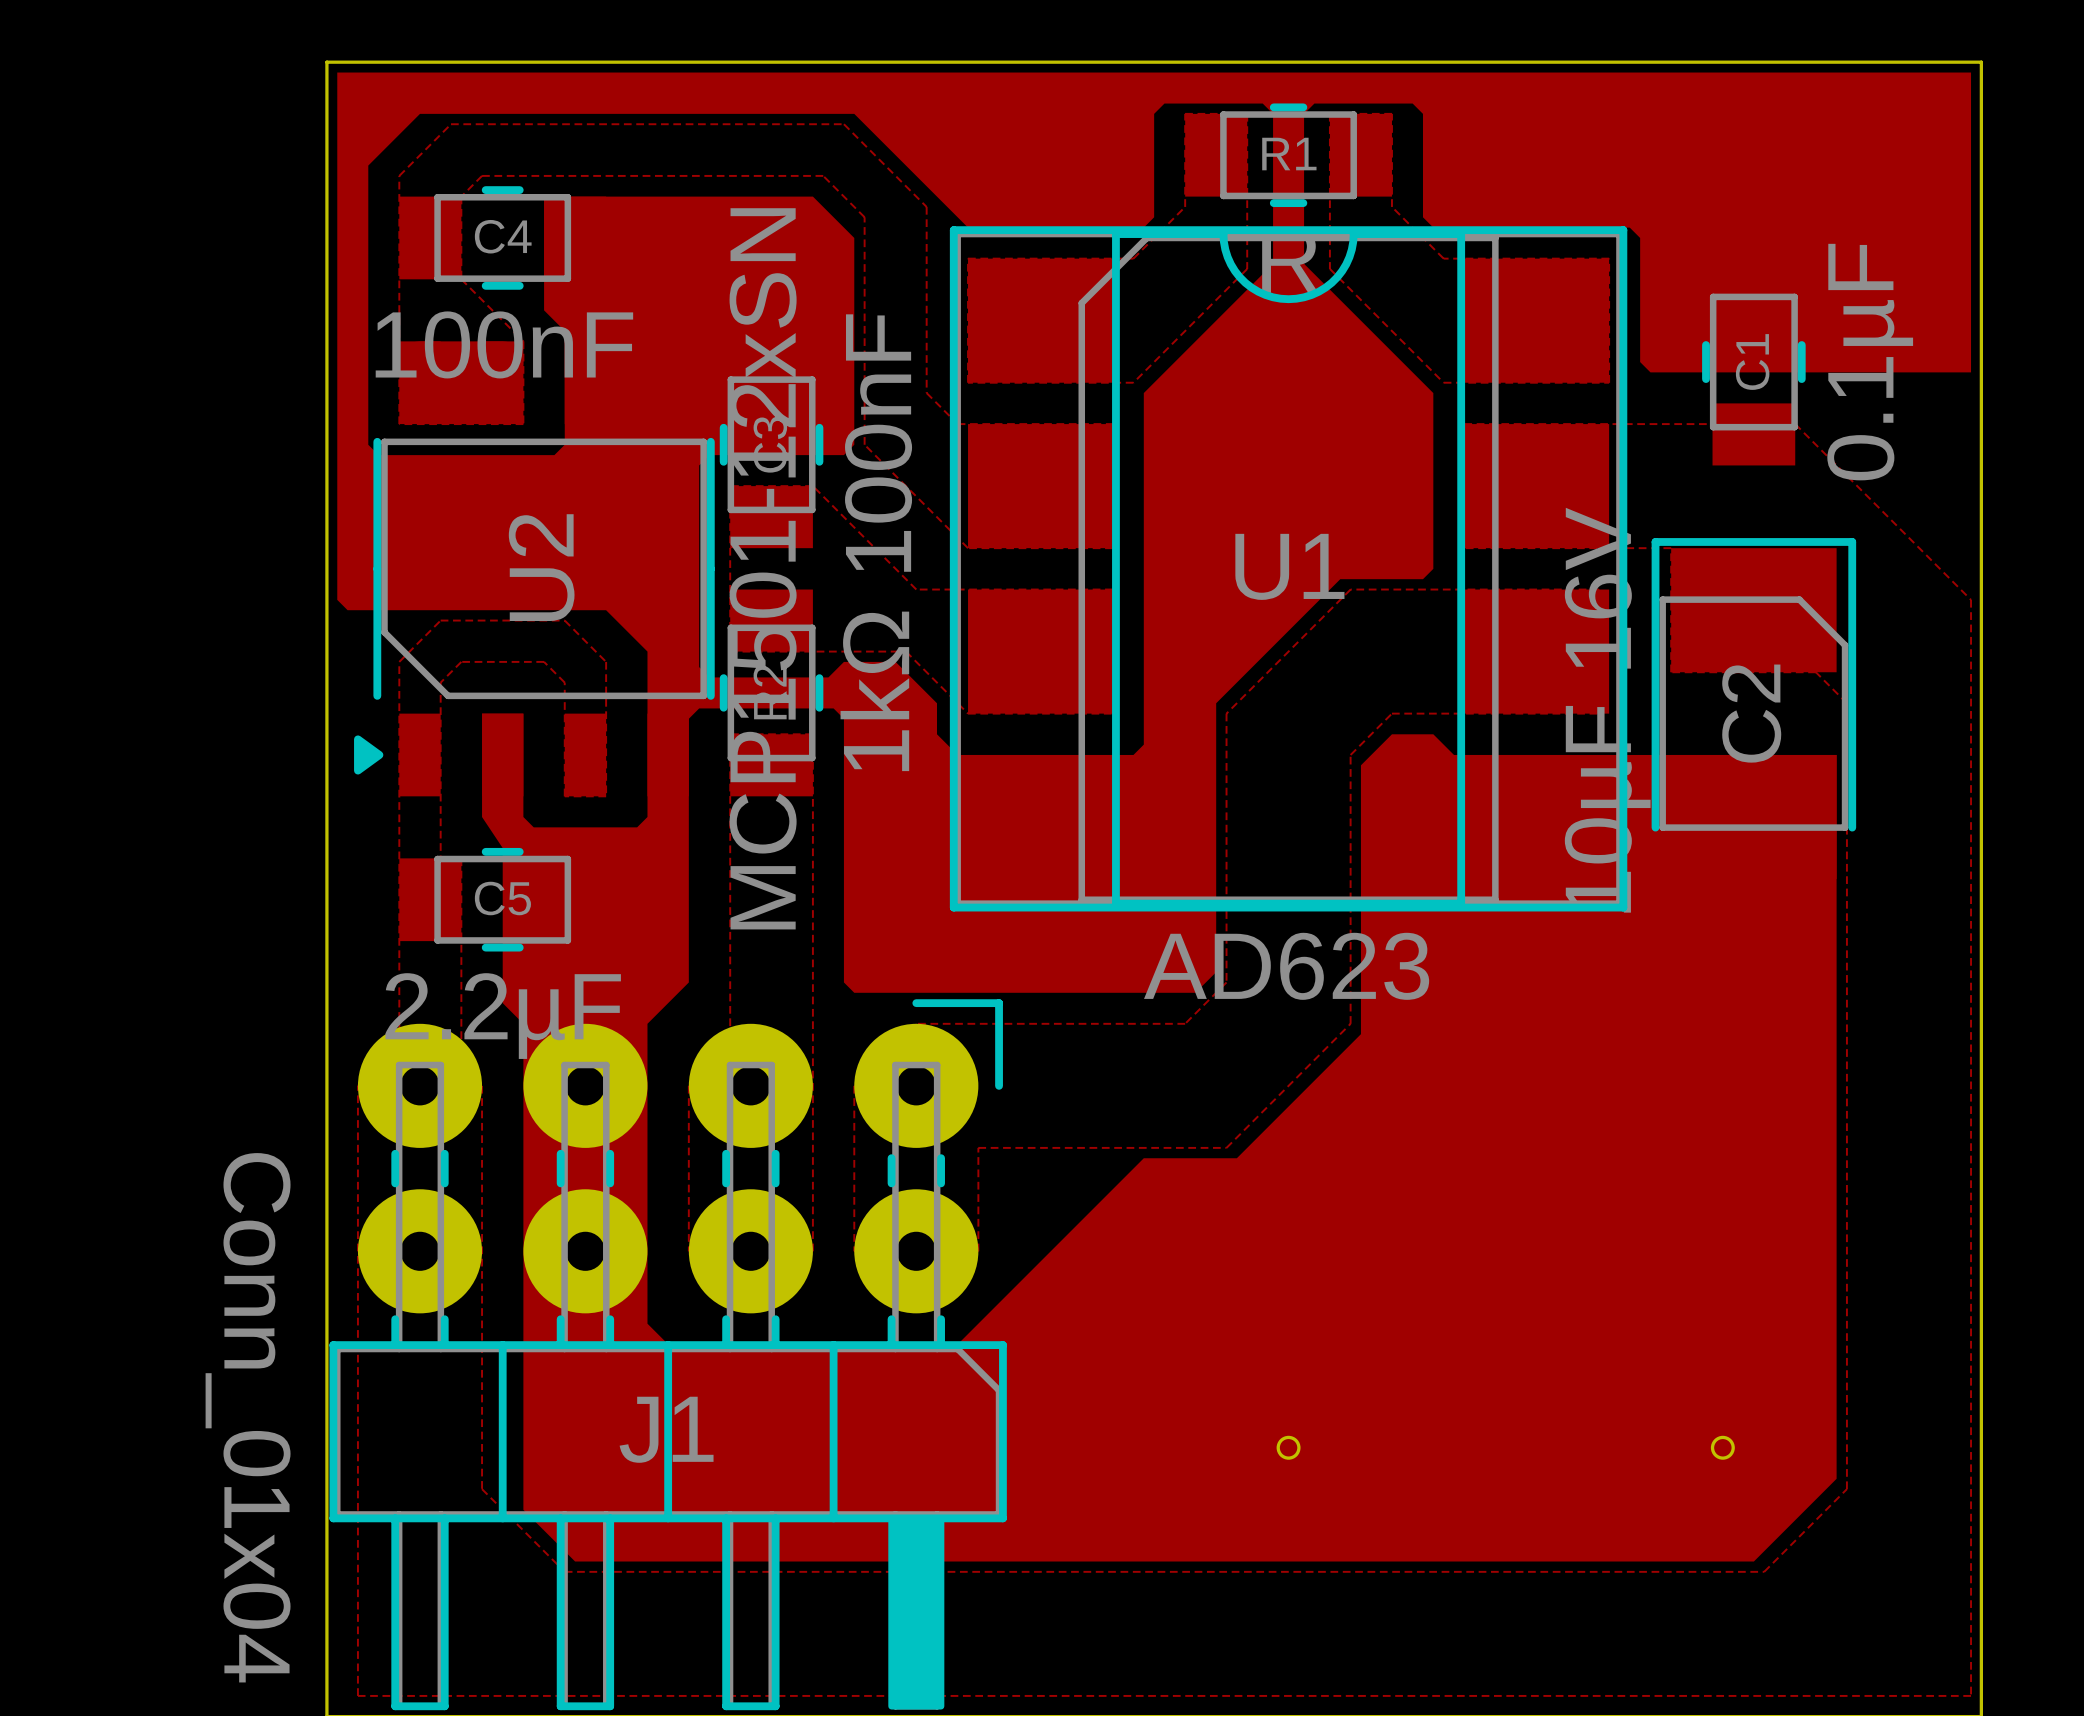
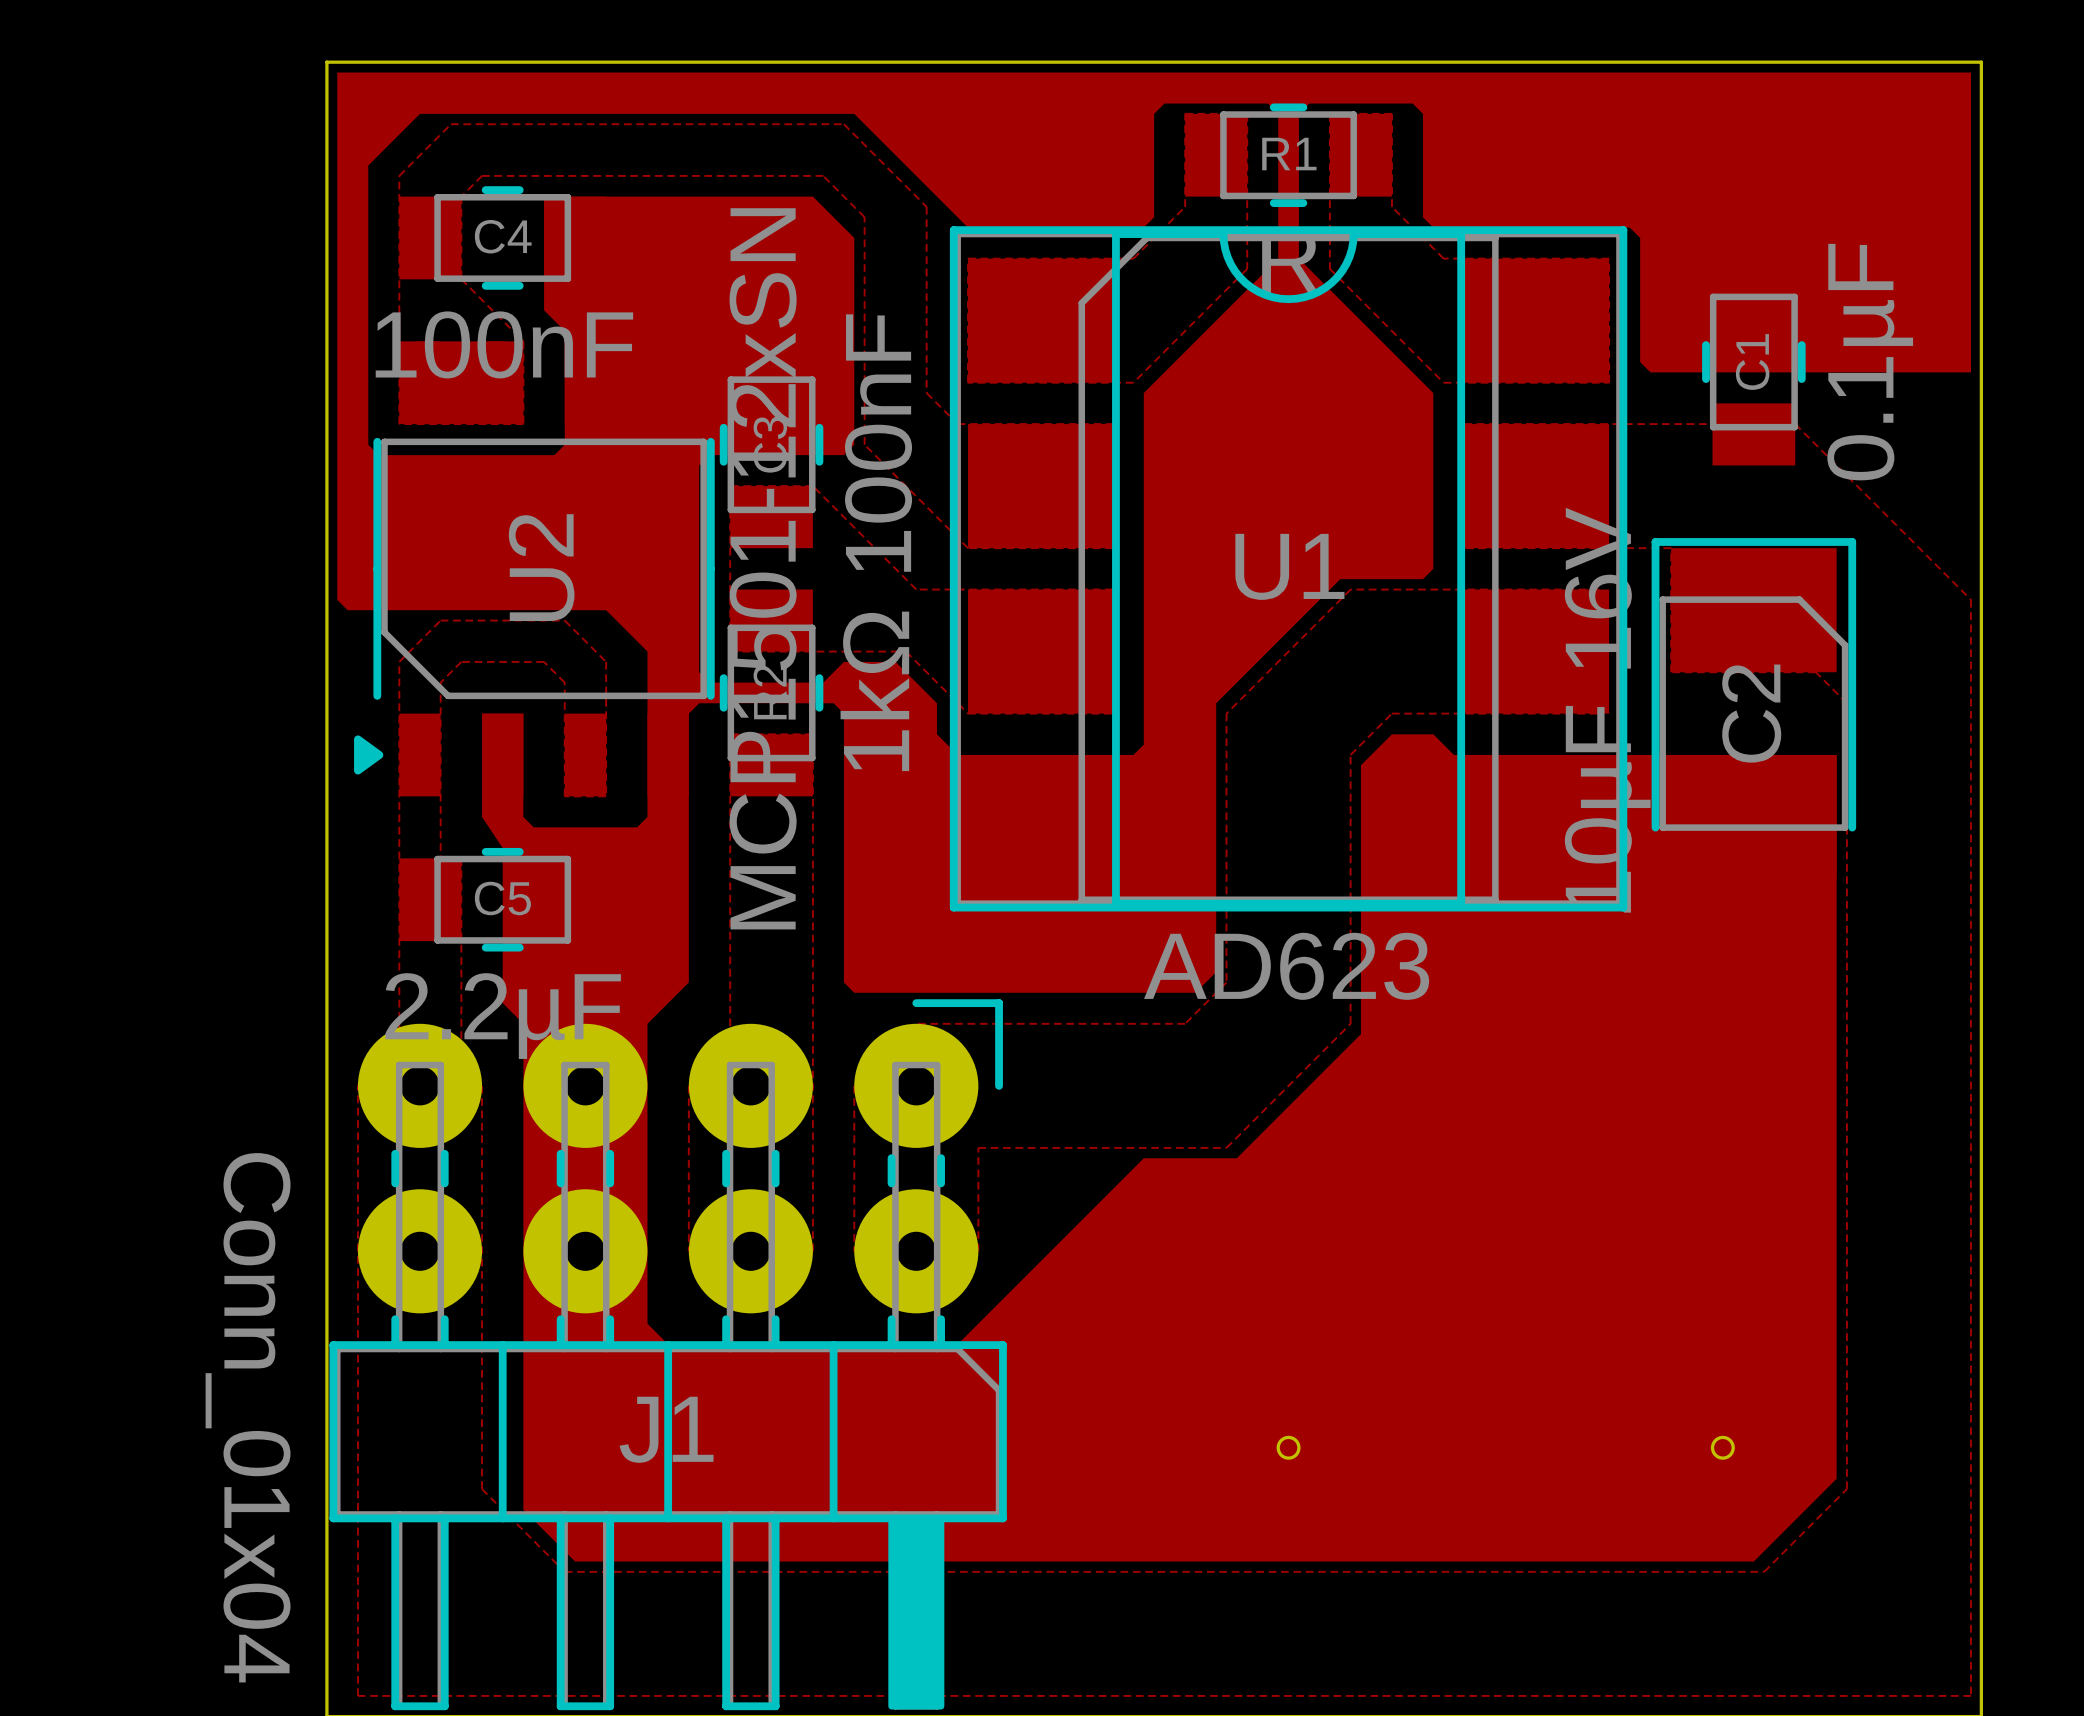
drawing shape: [337, 72, 1972, 1562] -> [337, 72, 1972, 1562]

